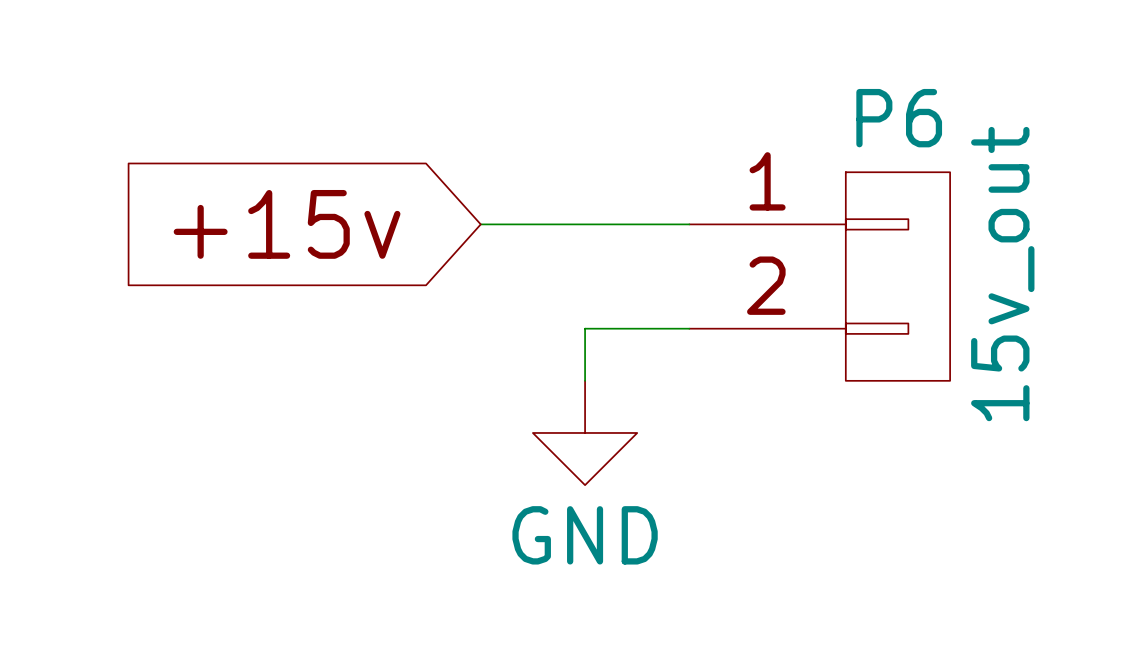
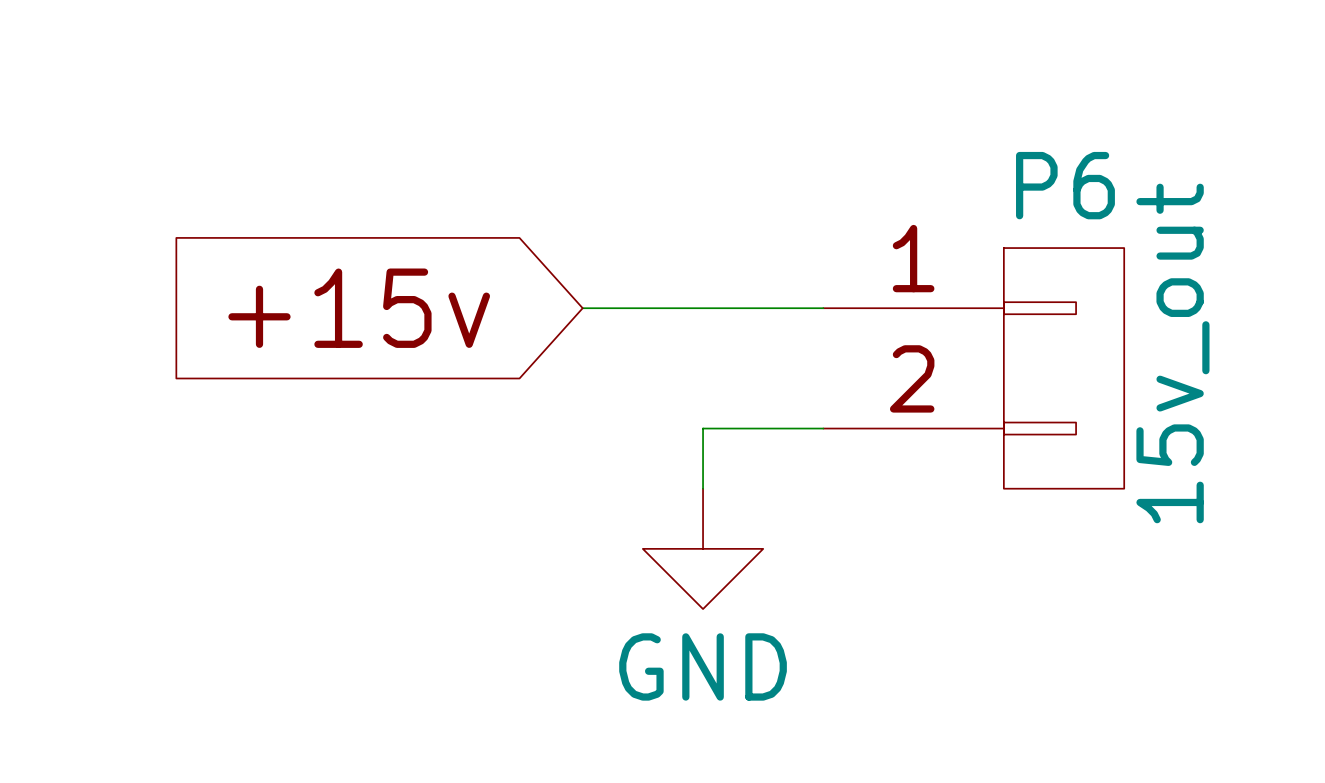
P6 value position: 15v_out (1002, 274) -> 15v_out (1172, 353)

